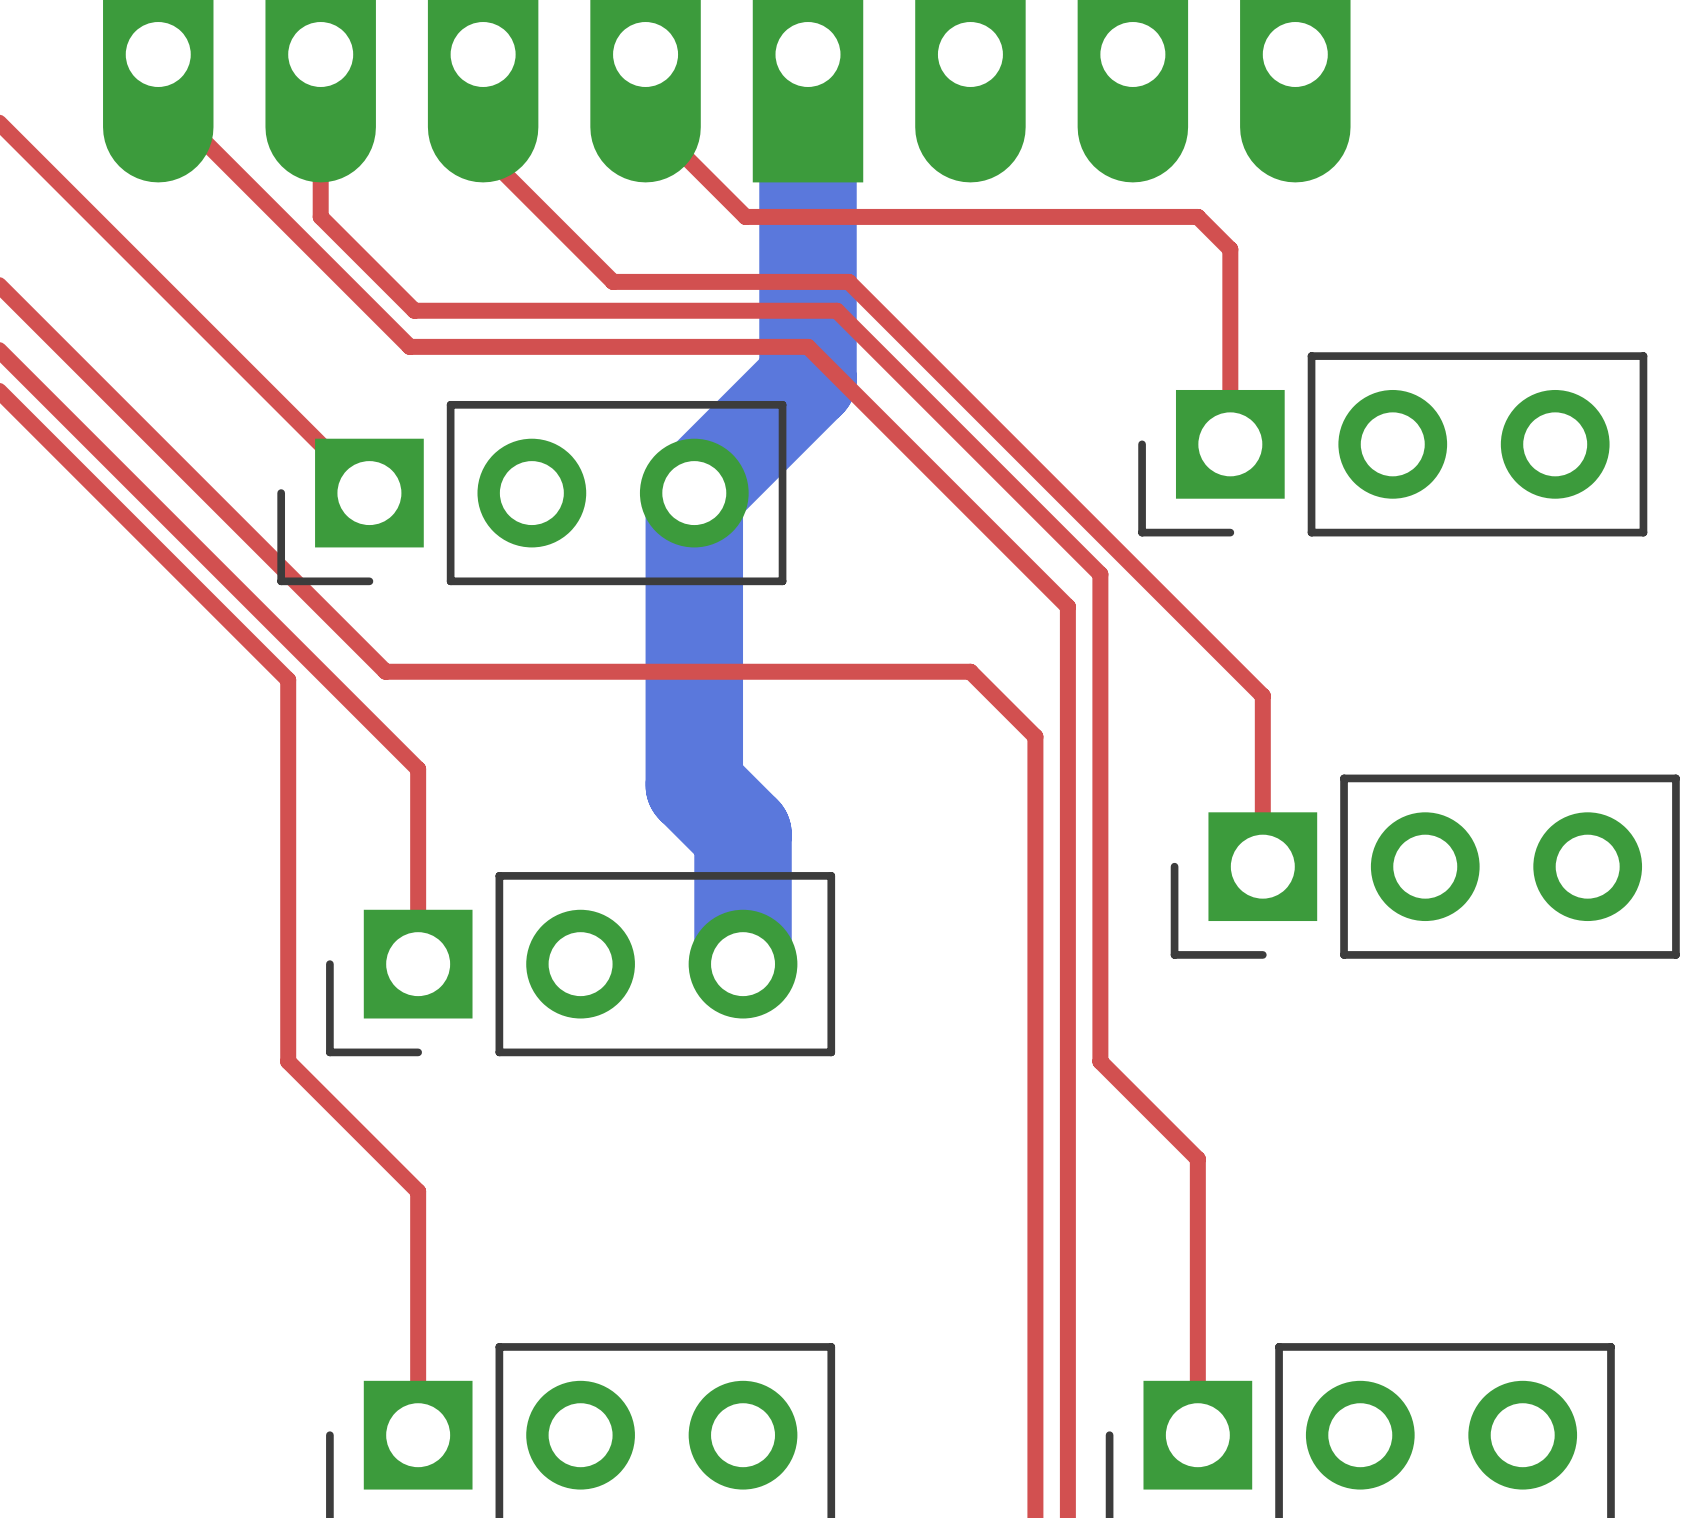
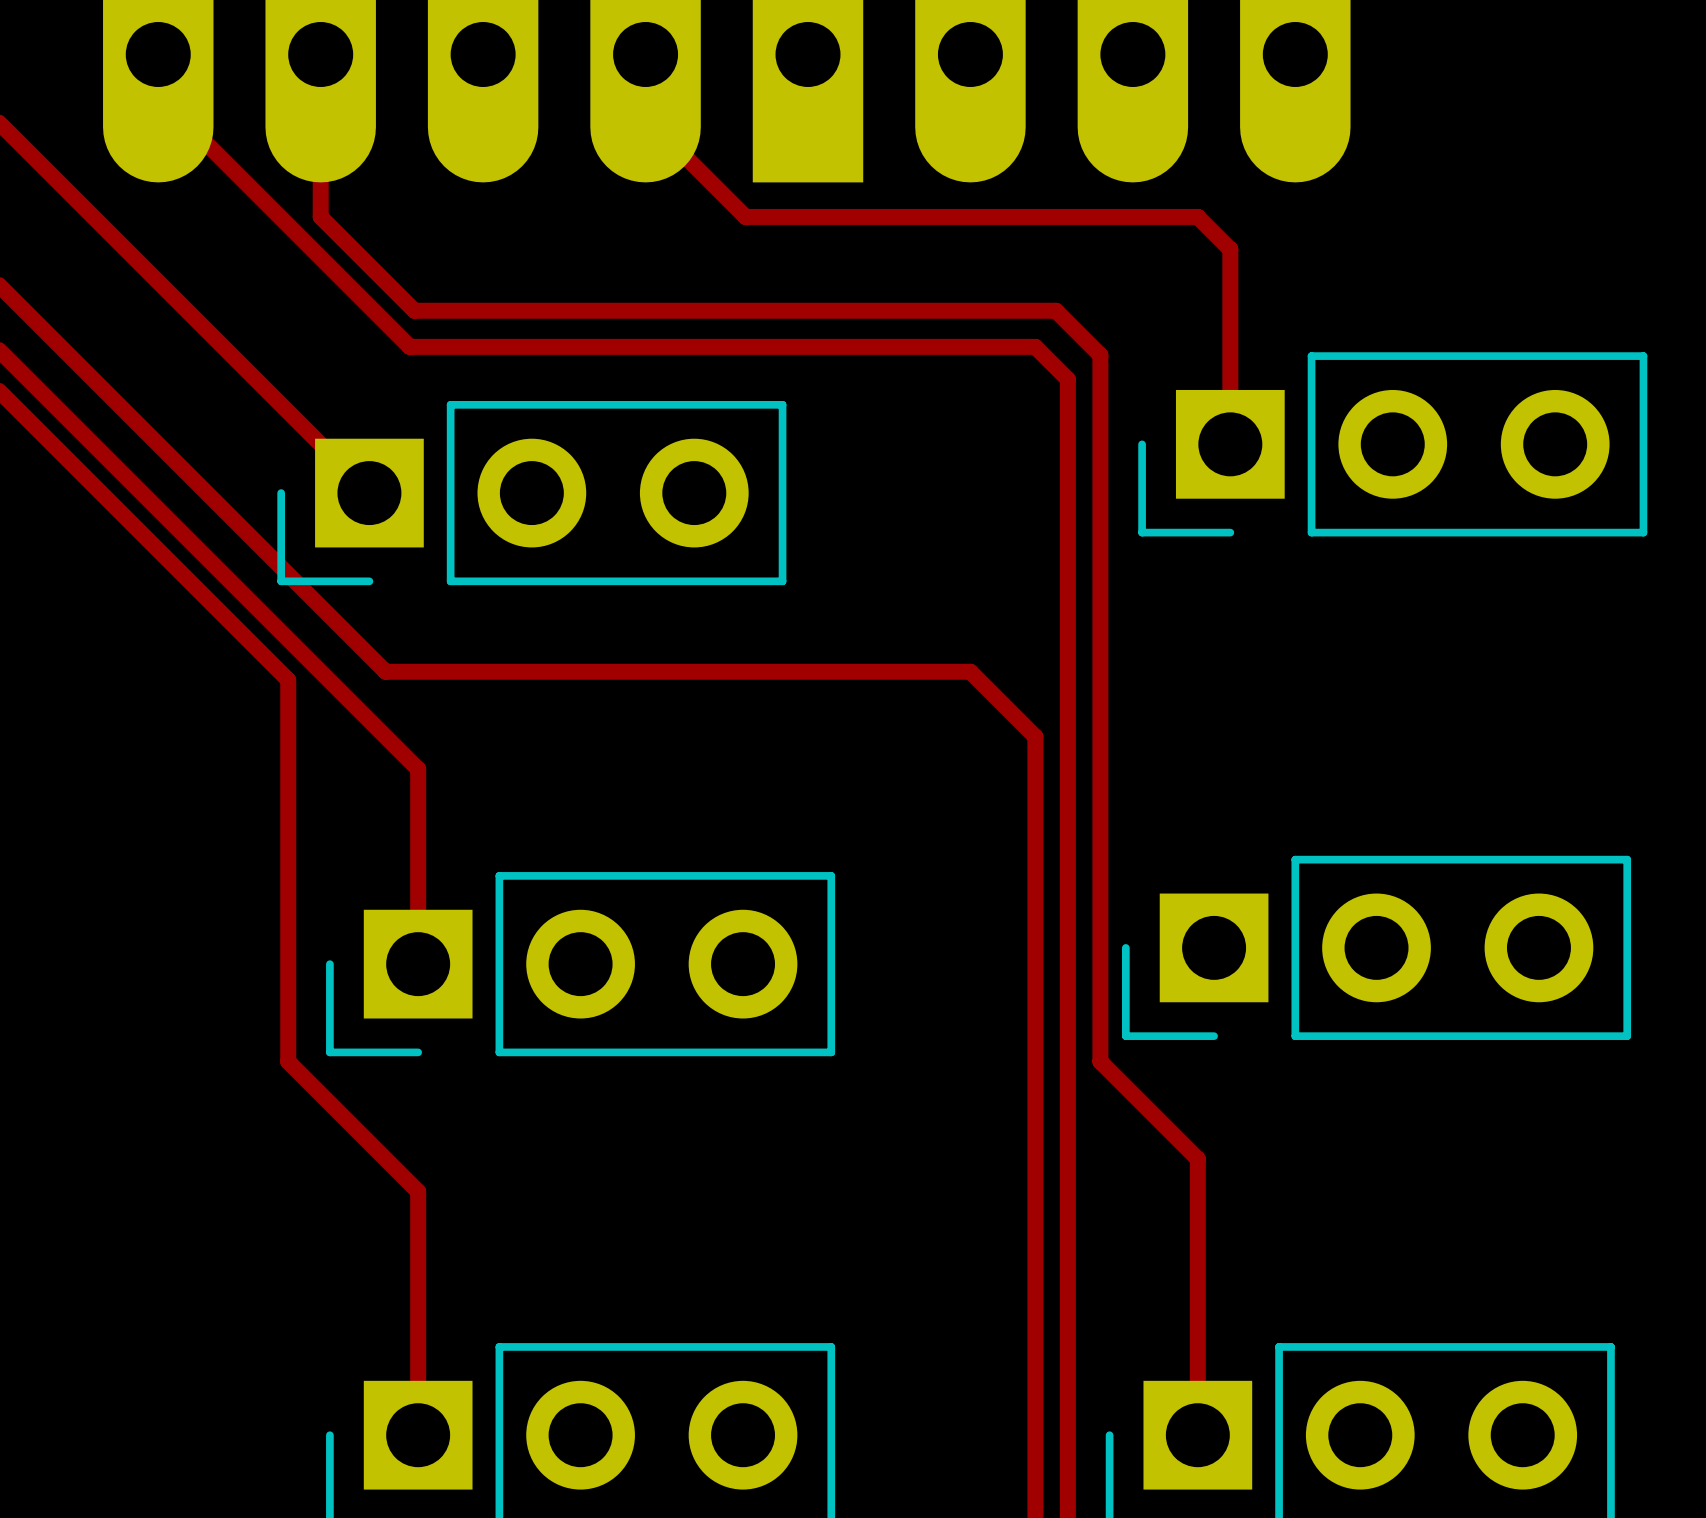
bottom track: (808, 54) (808, 379) (694, 493) (694, 785) (743, 834) (743, 964) -> none
top track: (483, 151) (613, 281) (848, 281) (1262, 695) (1262, 866) -> none
top track: (836, 310) (1100, 574) -> (836, 310) (1055, 310) (1100, 355) (1100, 574)
top track: (808, 346) (1067, 606) -> (808, 346) (1035, 346) (1067, 379) (1067, 606)
part position: (1425, 866) -> (1376, 947)

